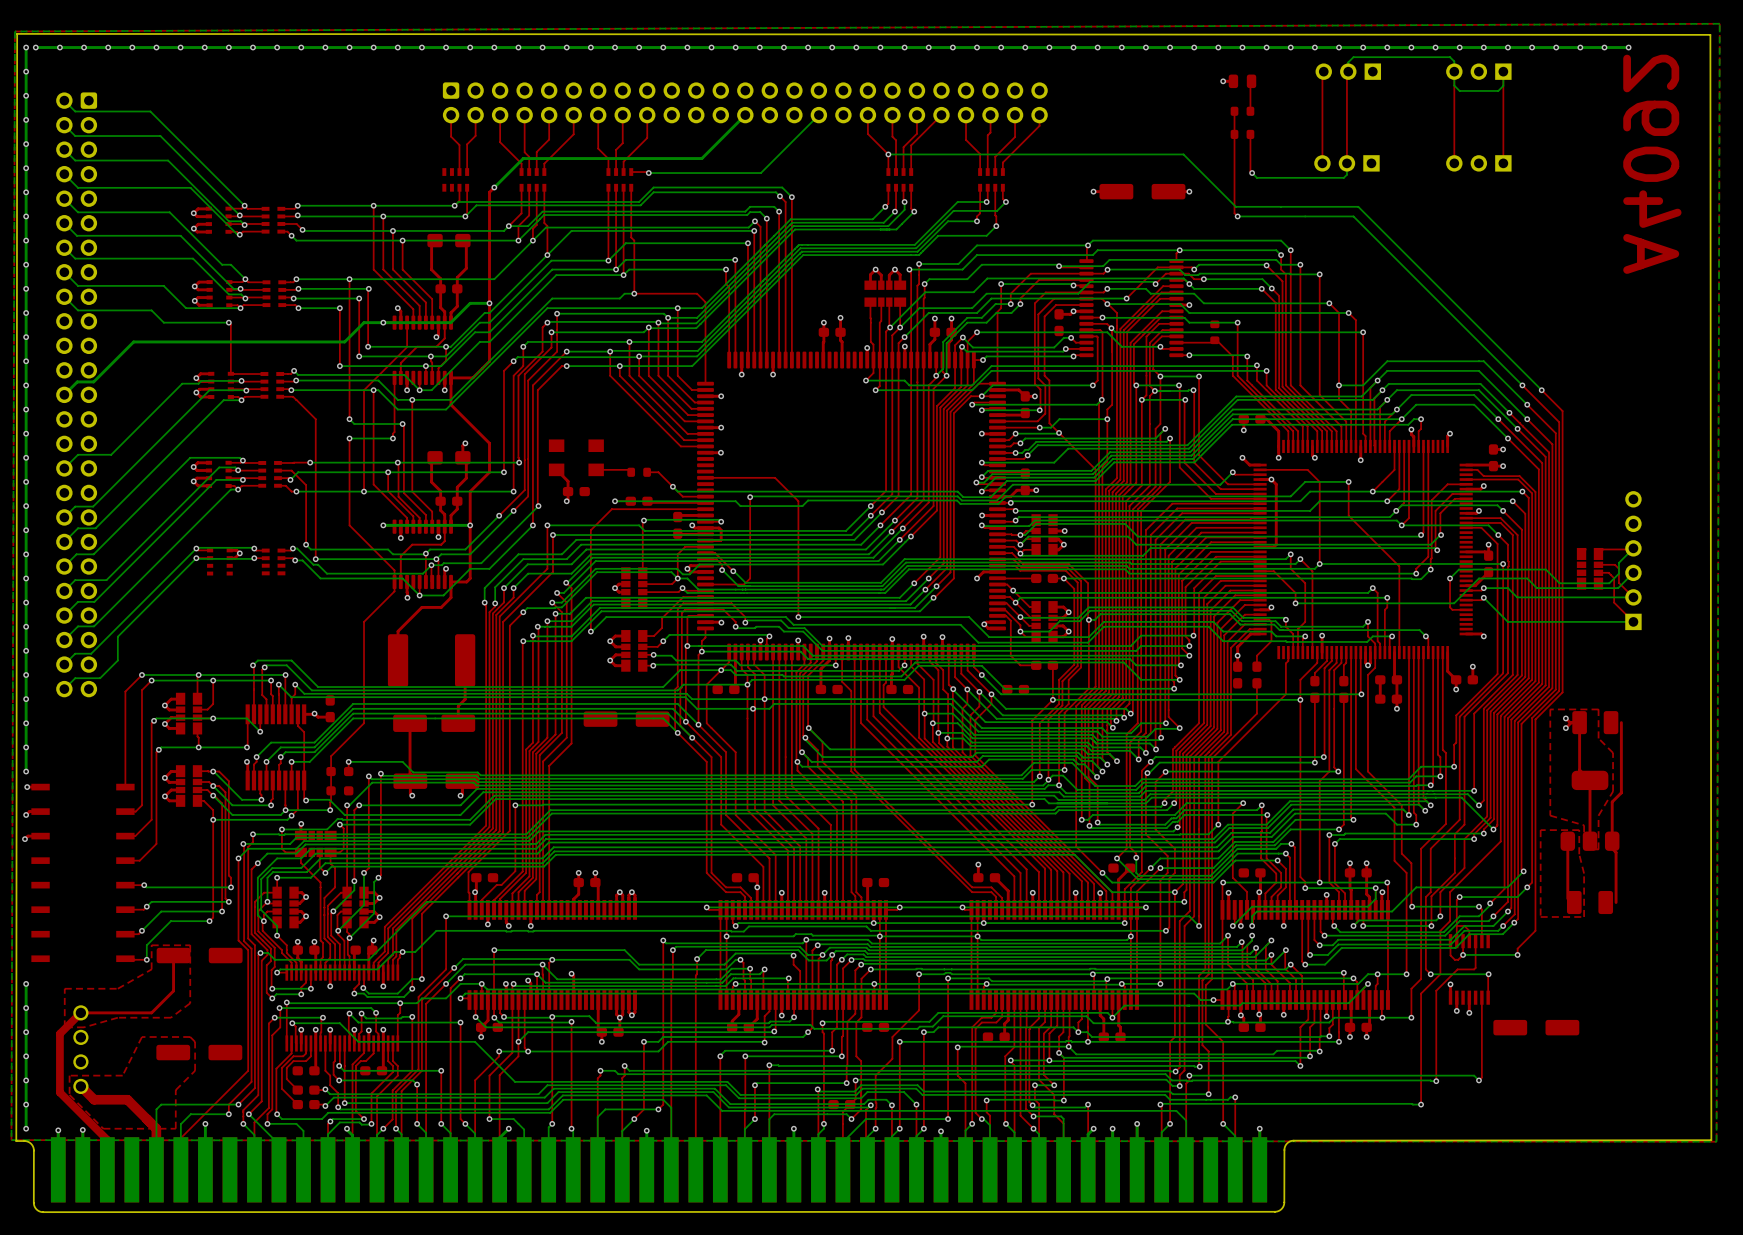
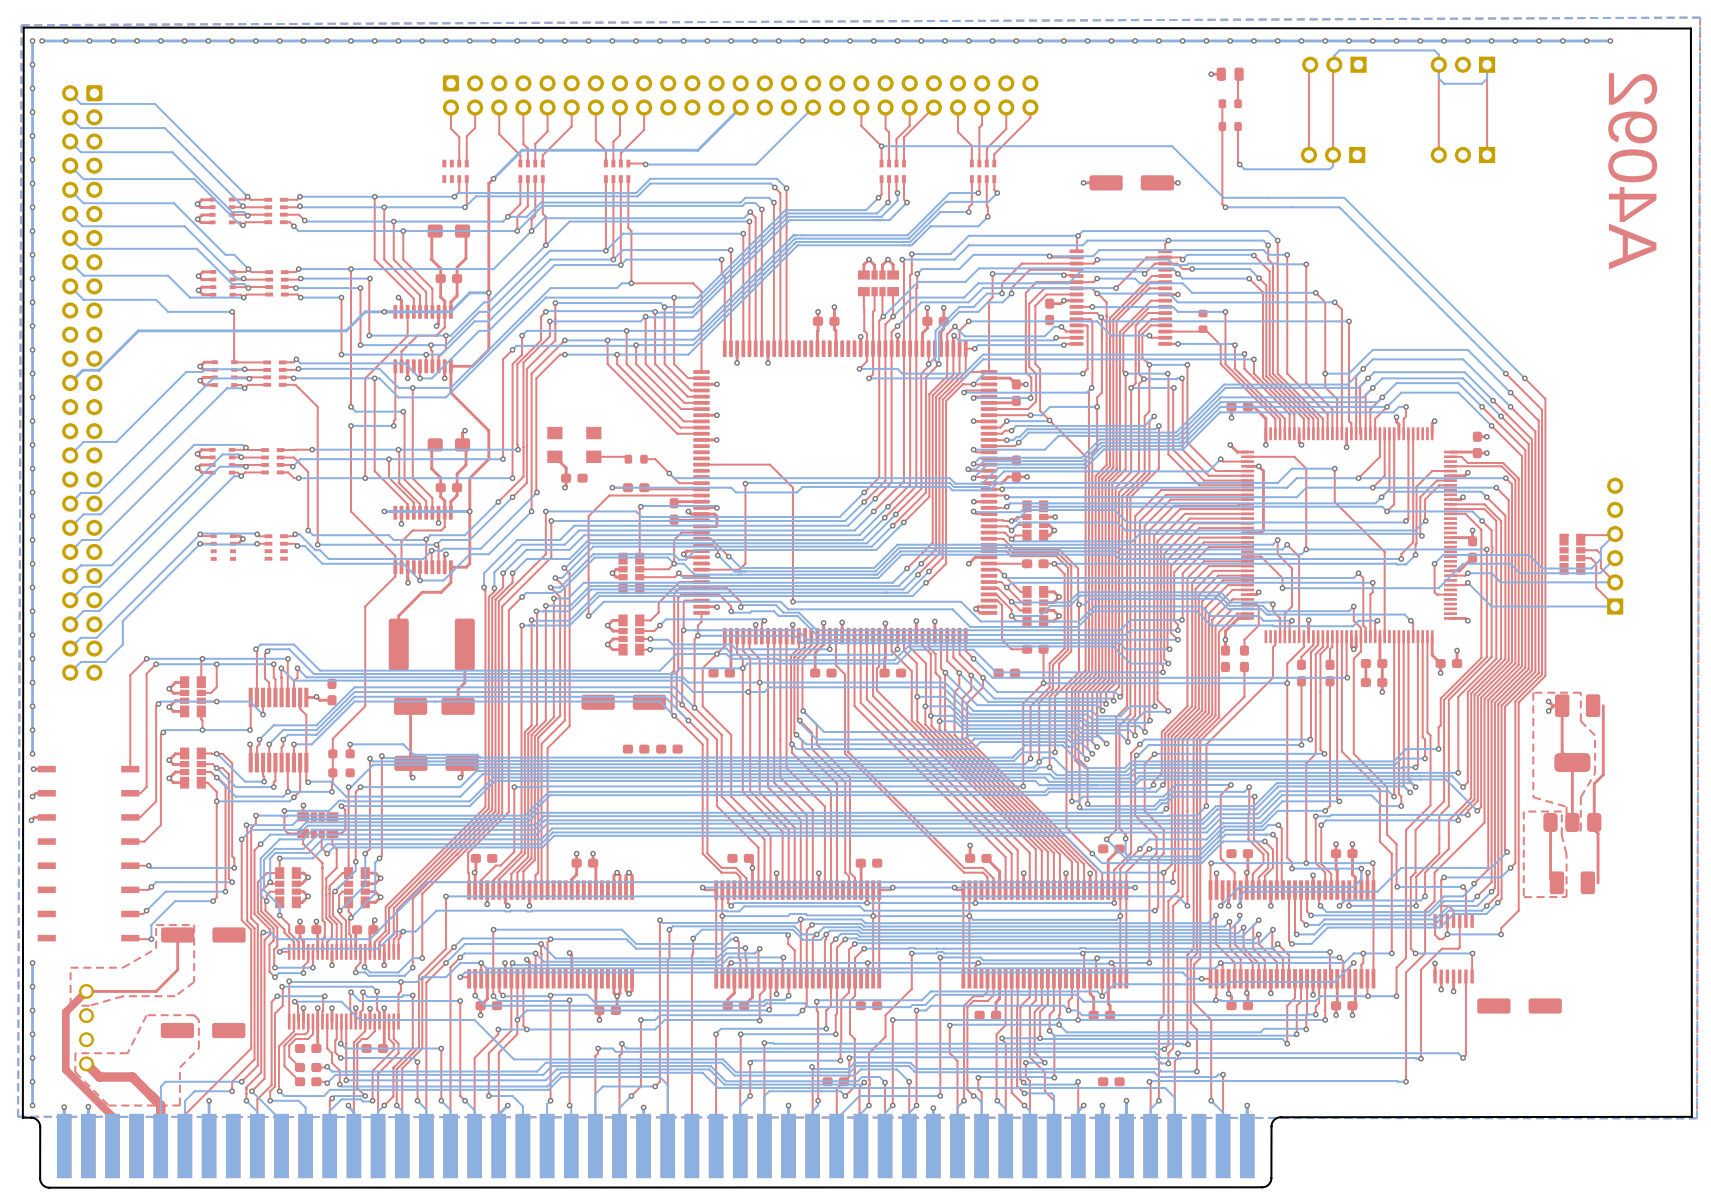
part: none -> (636, 749)
part: none -> (669, 749)
part: none -> (1111, 1081)

